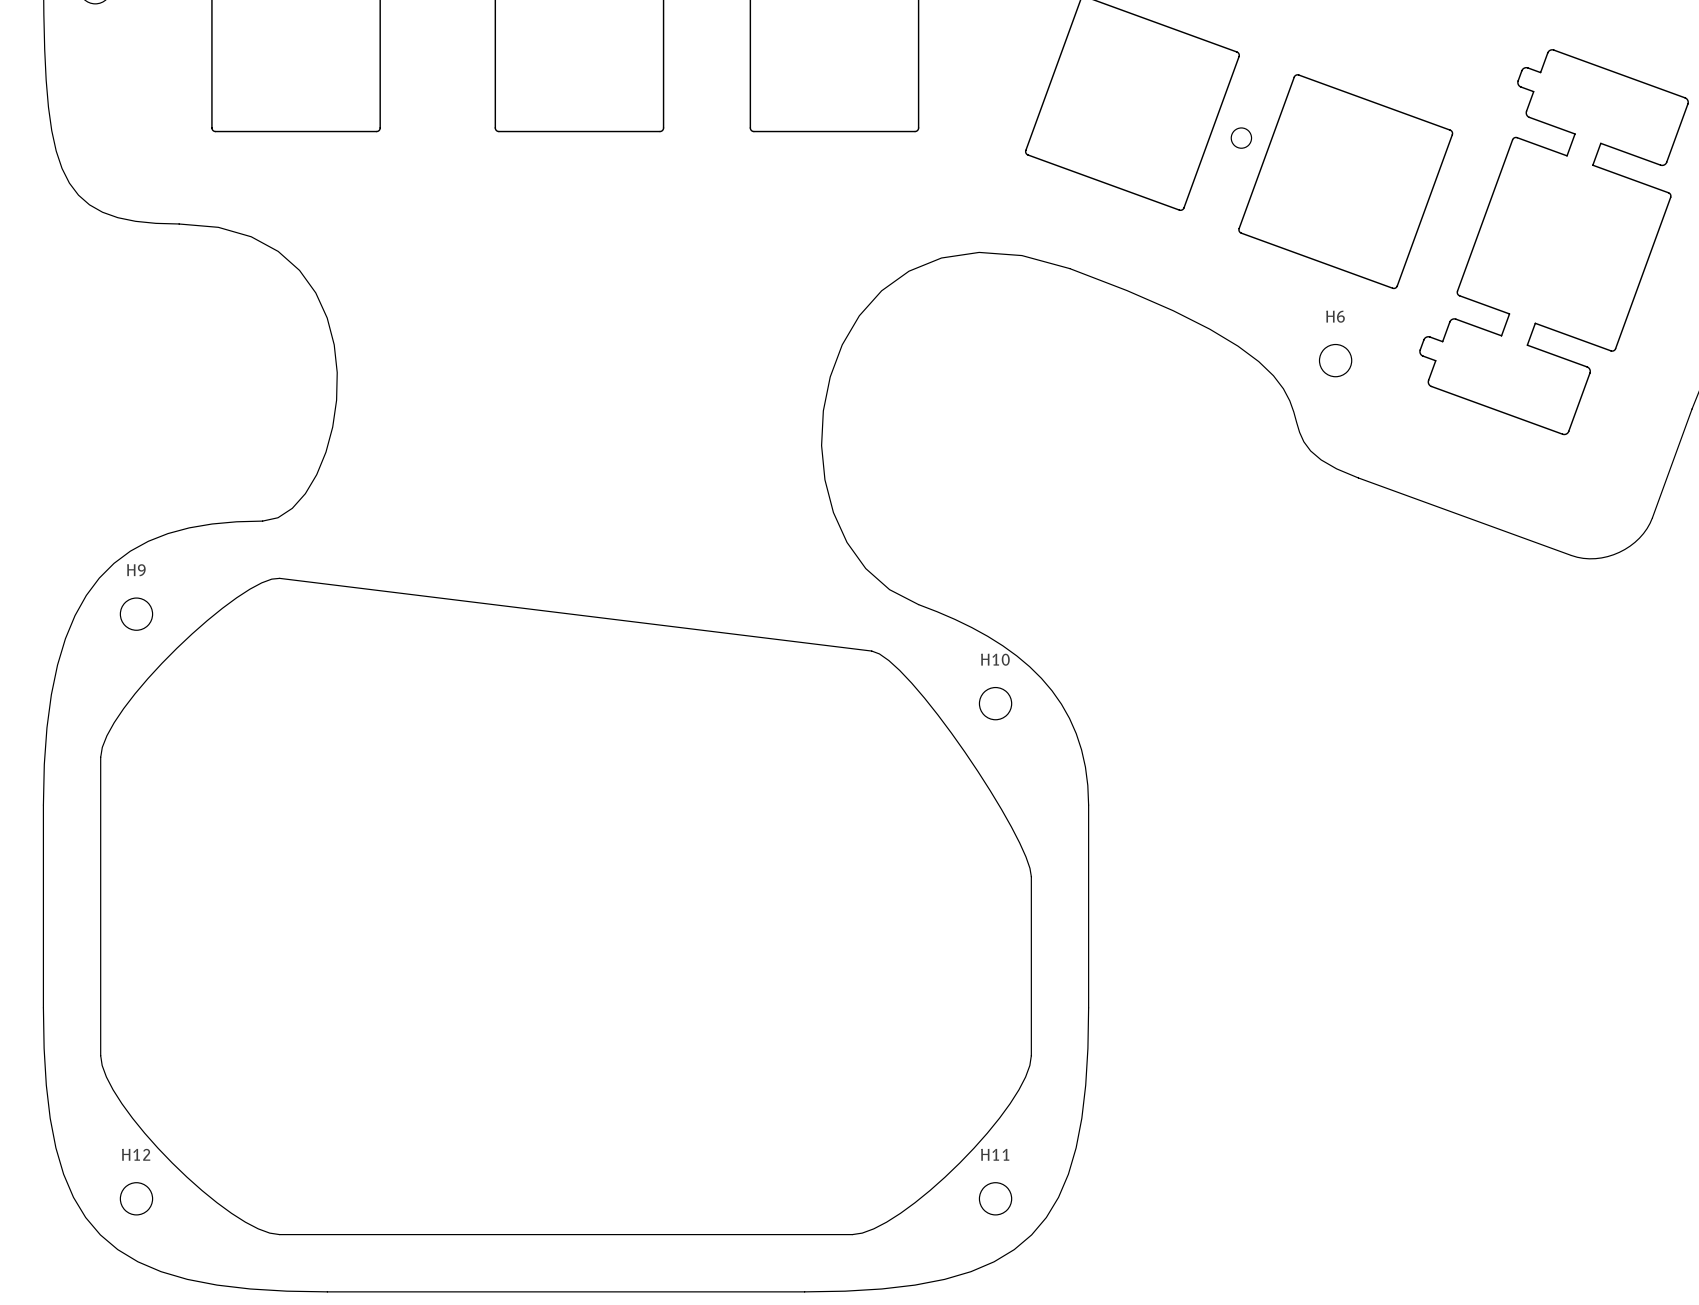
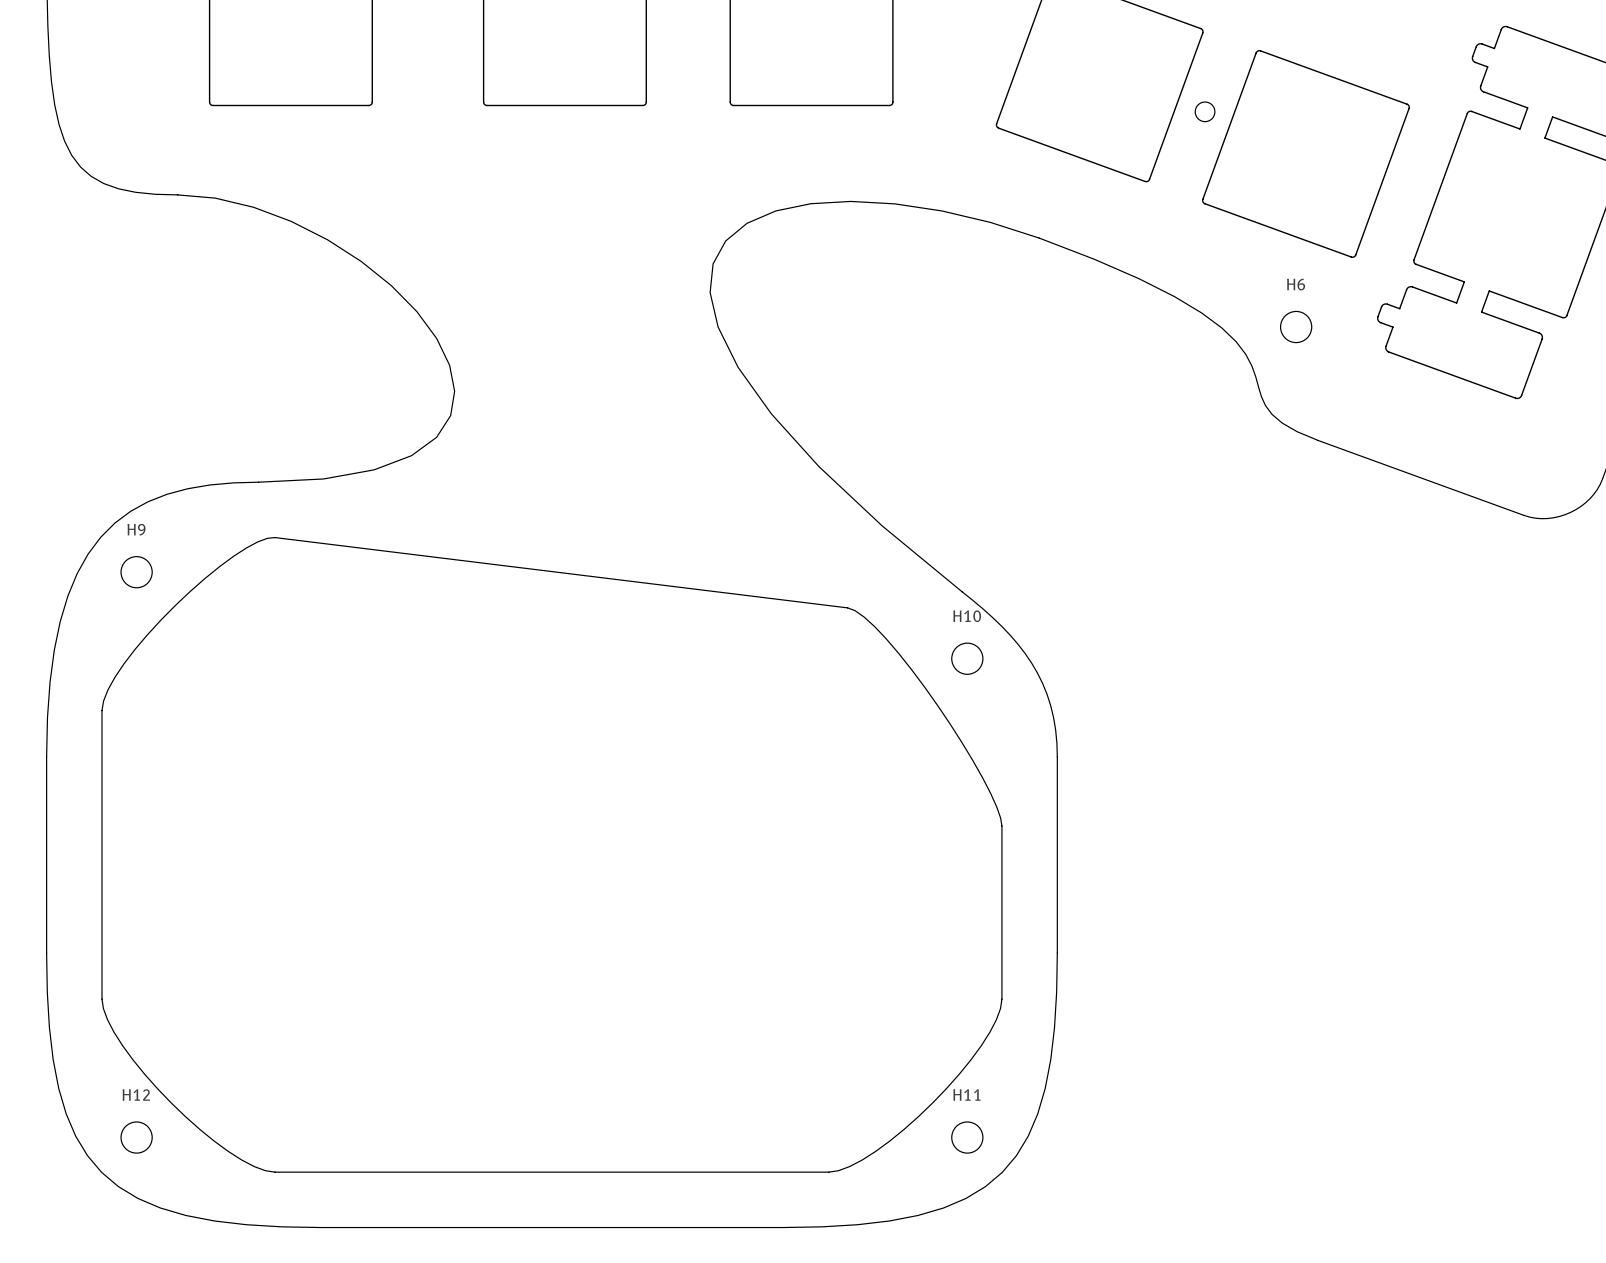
board edge: (179, 224) (218, 227) (251, 236) (278, 251) (299, 270) (315, 292) (327, 318) (334, 344) (337, 372) (336, 400) (332, 427) (325, 452) (316, 474) (305, 493) (292, 508) (277, 517) (262, 521) -> (177, 194) (215, 198) (253, 207) (291, 221) (327, 239) (361, 261) (391, 285) (417, 311) (436, 338) (449, 365) (454, 391) (450, 415) (436, 437) (411, 455) (374, 469) (323, 478) (258, 482)
board edge: (1069, 268) (1021, 255) (979, 252) (941, 258) (909, 271) (881, 290) (859, 315) (842, 344) (830, 376) (823, 410) (821, 445) (824, 479) (833, 512) (847, 542) (865, 568) (889, 589) (971, 627) (1002, 645) (1029, 666) (1052, 690) (1069, 718) (1081, 749) (1087, 785) (1088, 805) -> (1039, 238) (990, 222) (941, 210) (894, 203) (850, 201) (810, 203) (775, 210) (747, 223) (725, 240) (713, 263) (710, 292) (718, 327) (738, 367) (771, 413) (819, 466) (882, 525) (992, 617) (1025, 653) (1042, 683) (1050, 705) (1055, 730) (1057, 756)

